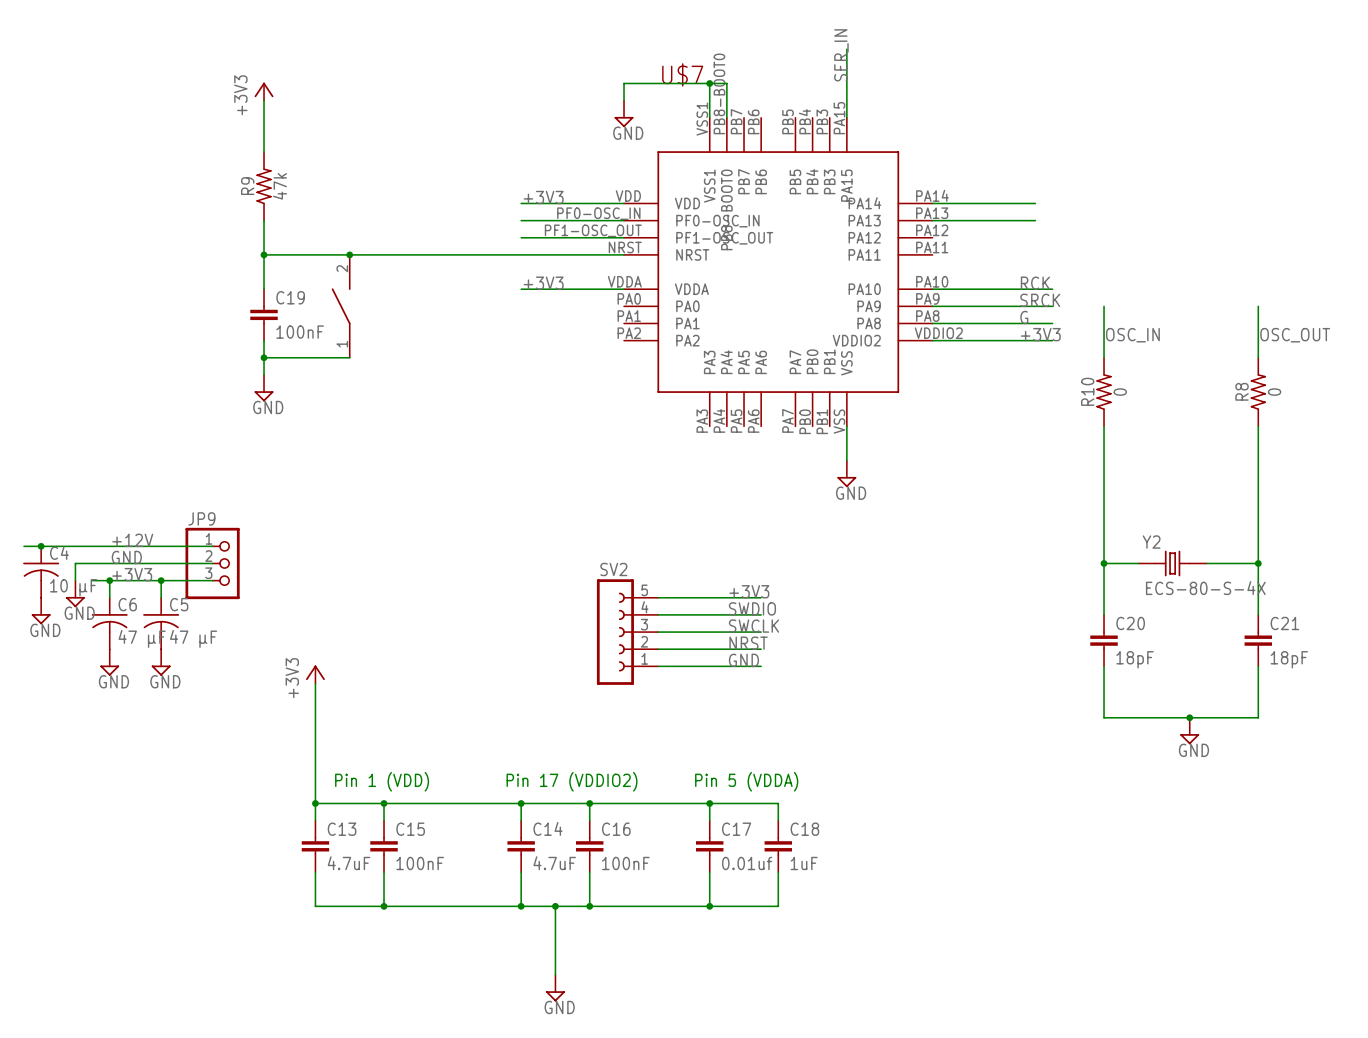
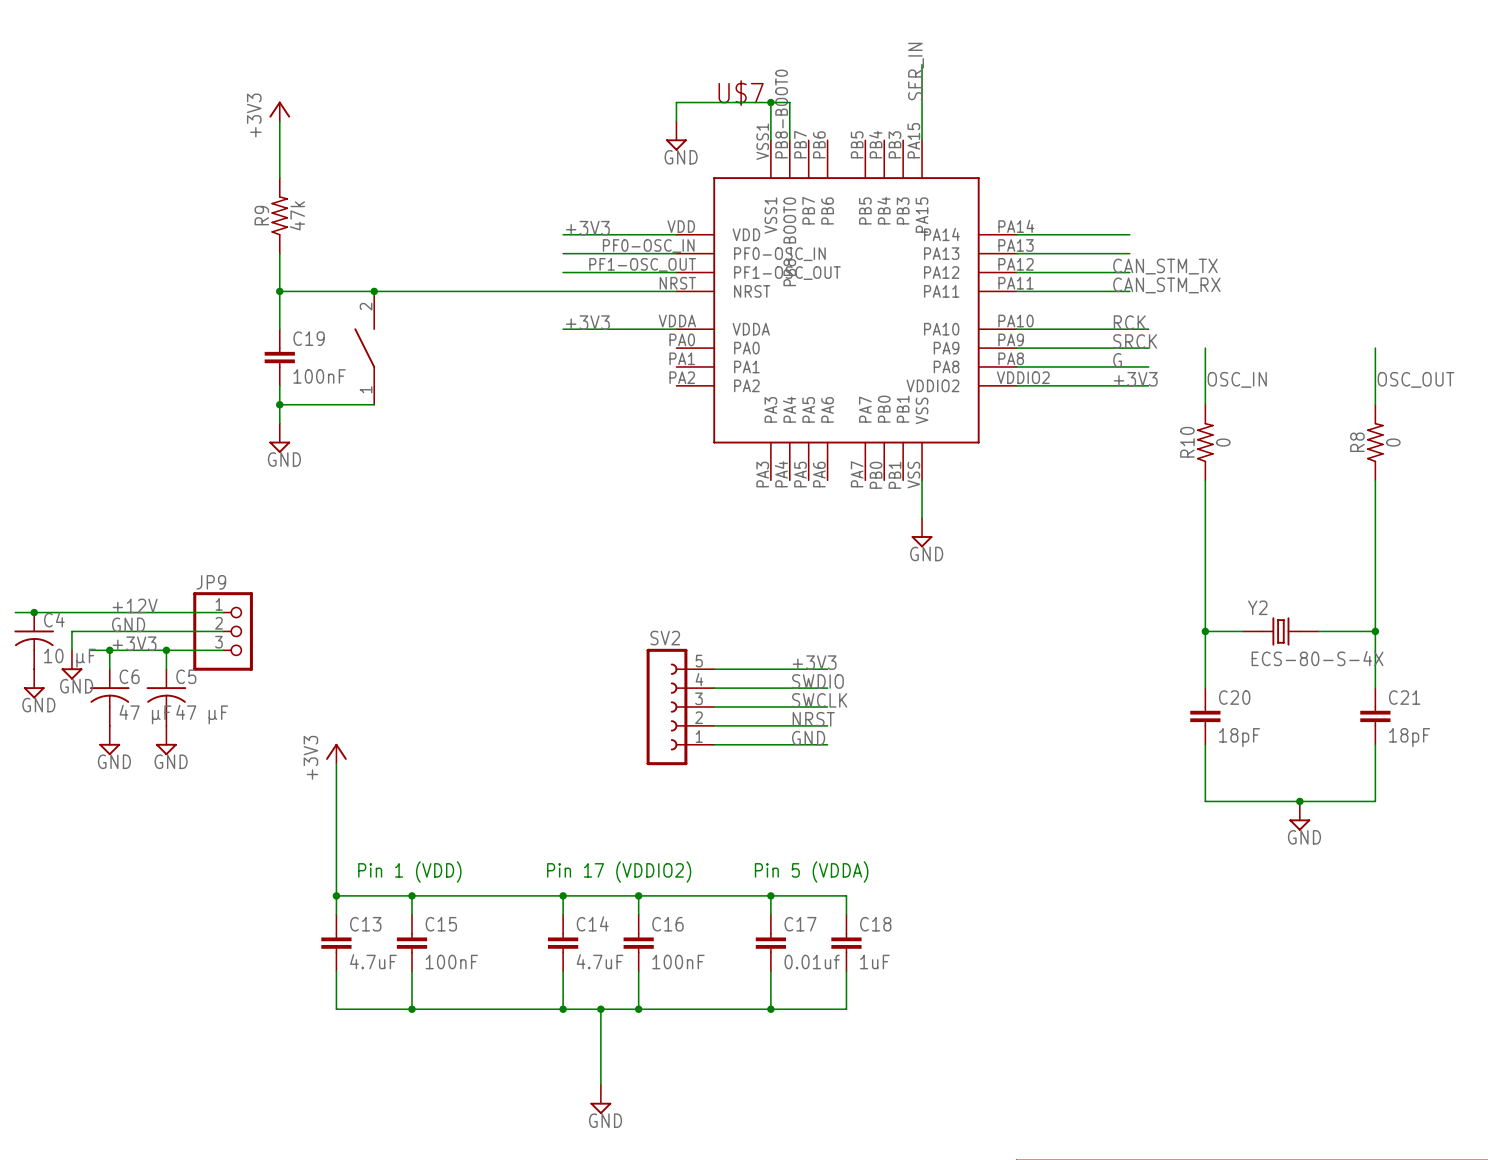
label: none -> CAN_STM_TX (1165, 266)
wire: none -> (1016, 272) (1129, 272)
label: none -> CAN_STM_RX (1166, 285)
wire: none -> (1016, 291) (1129, 291)

